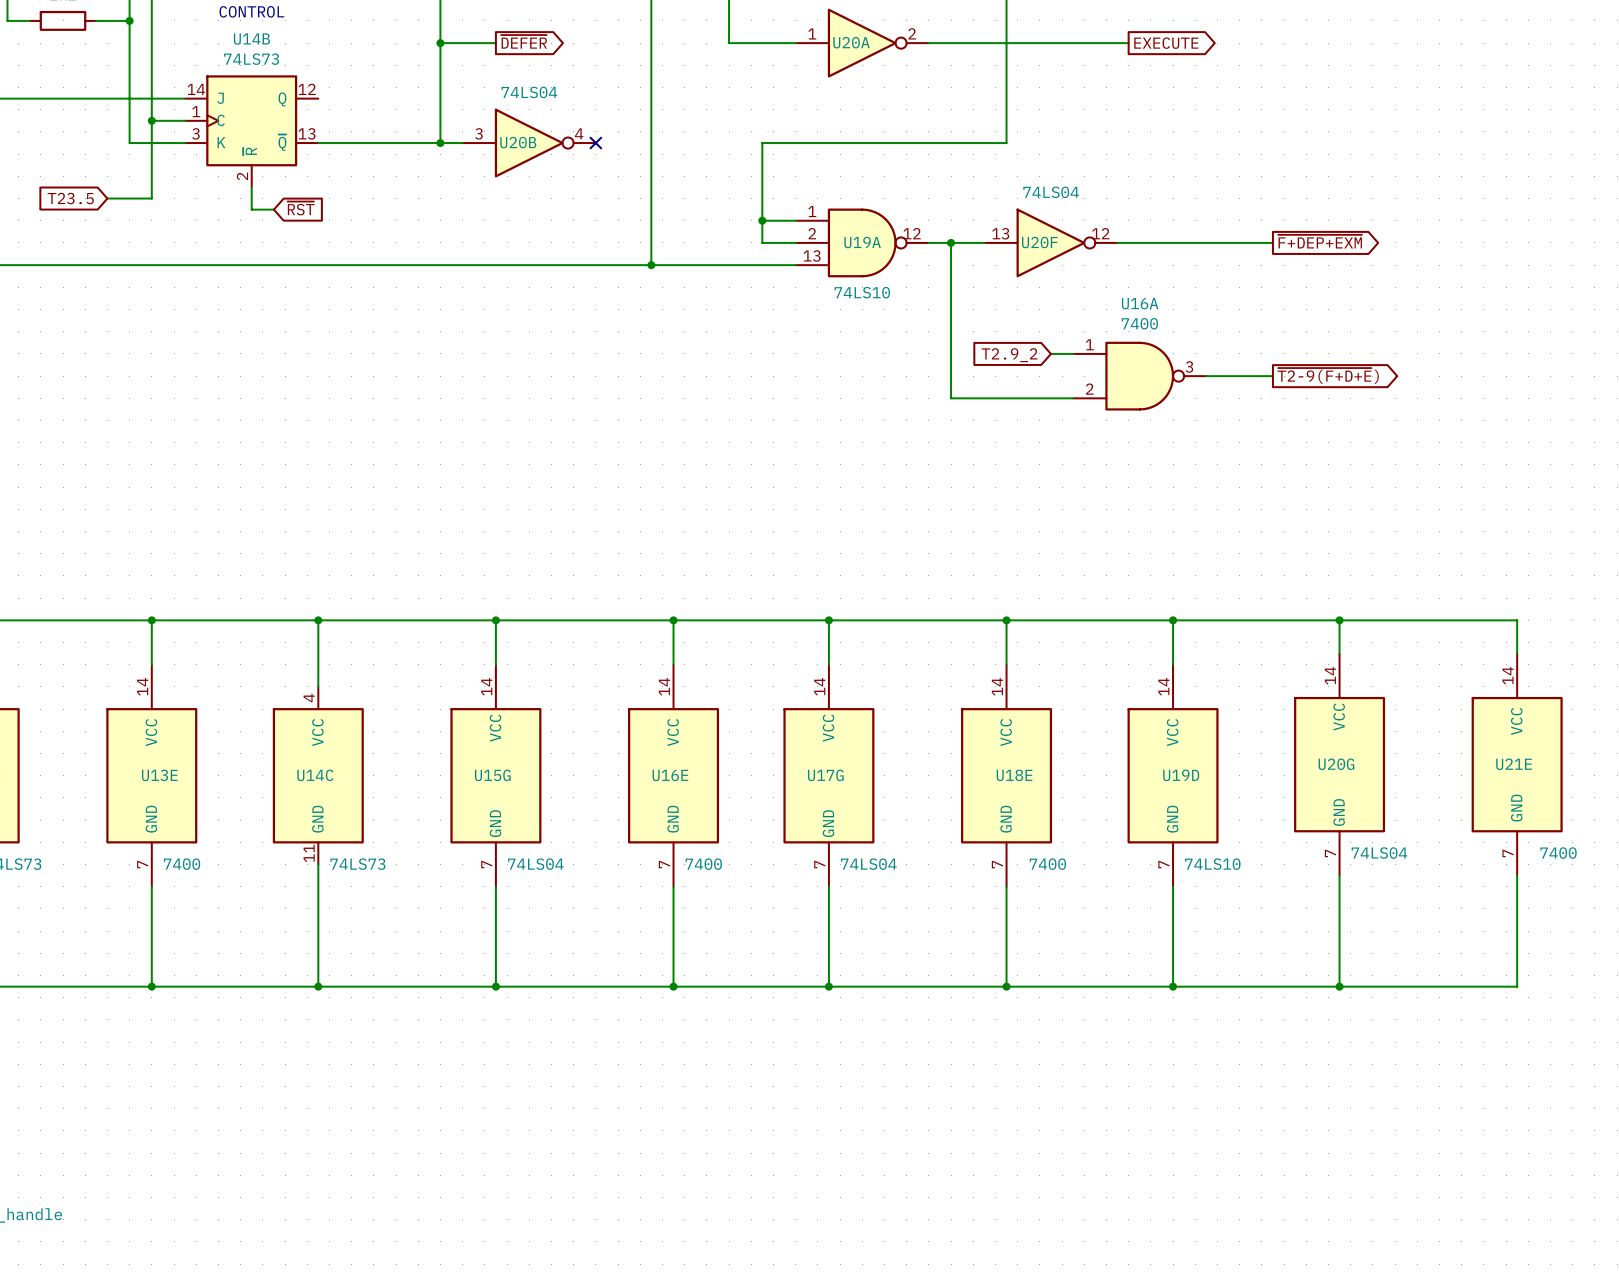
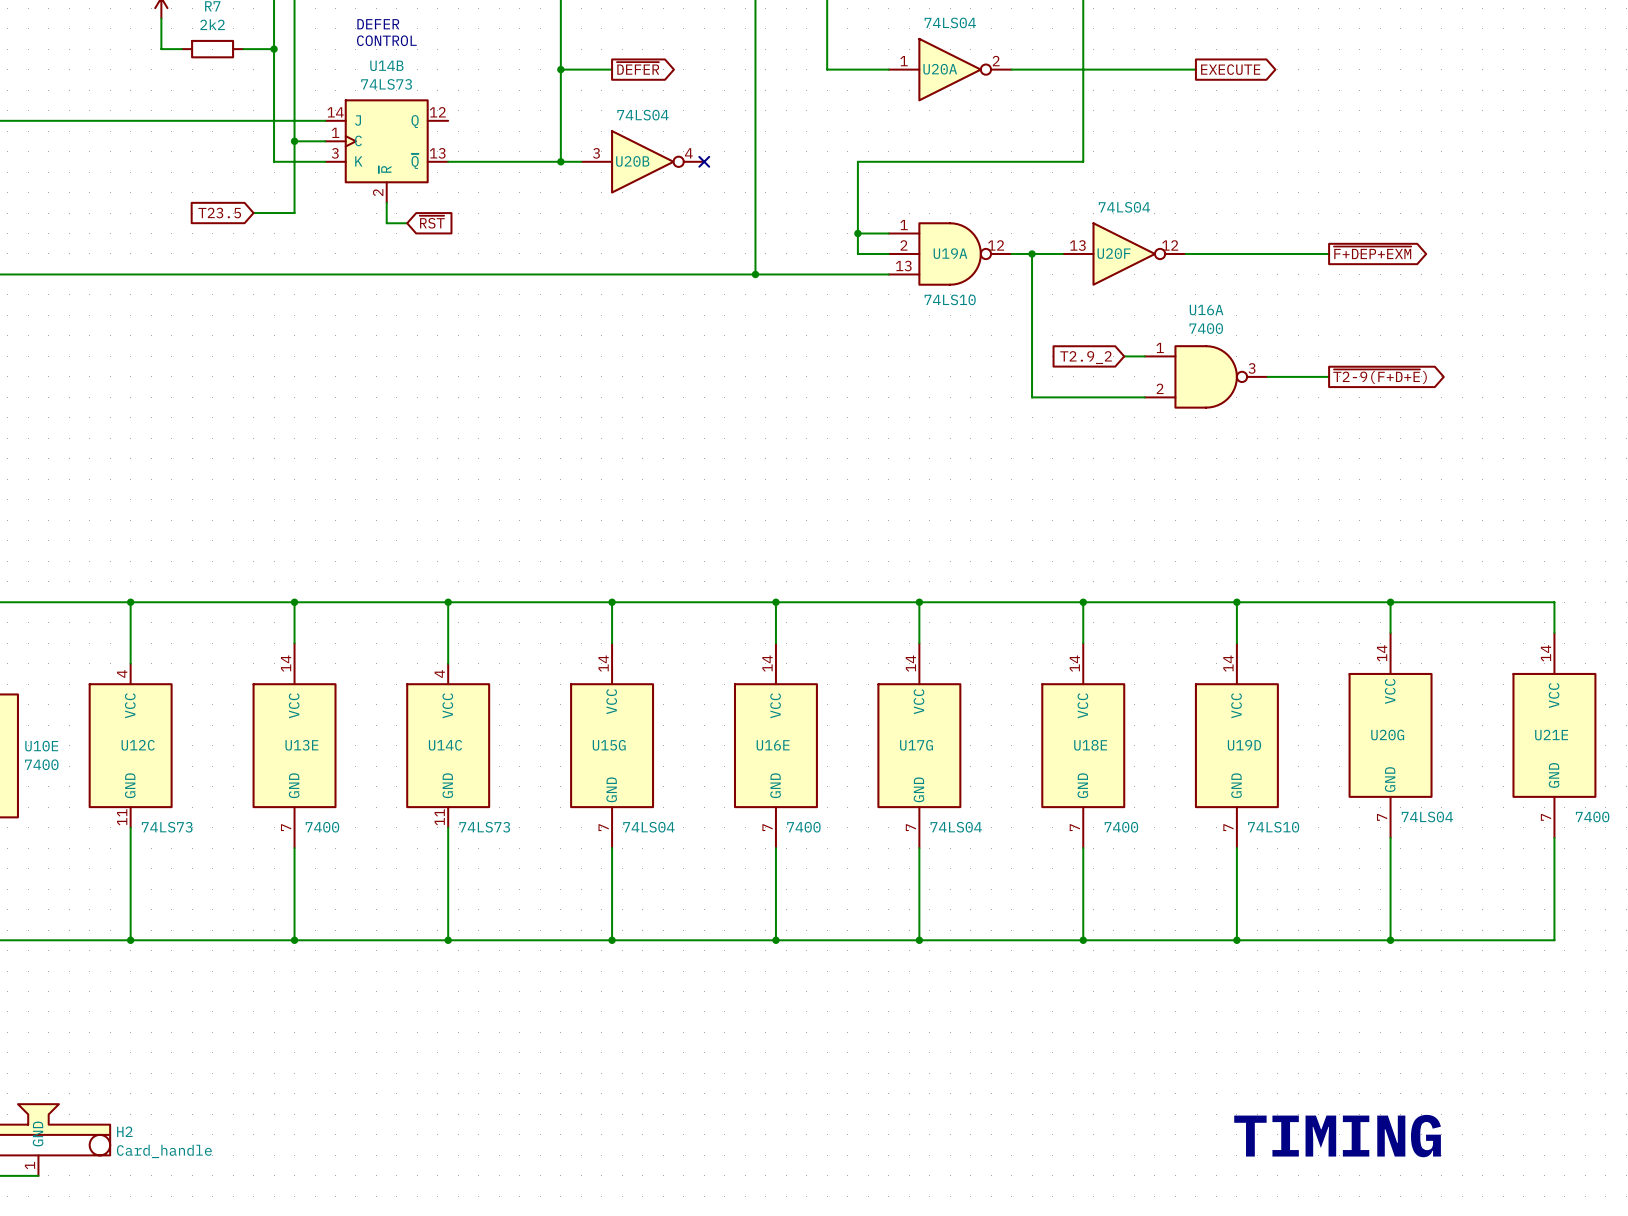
text: none -> TIMING (1337, 1136)

